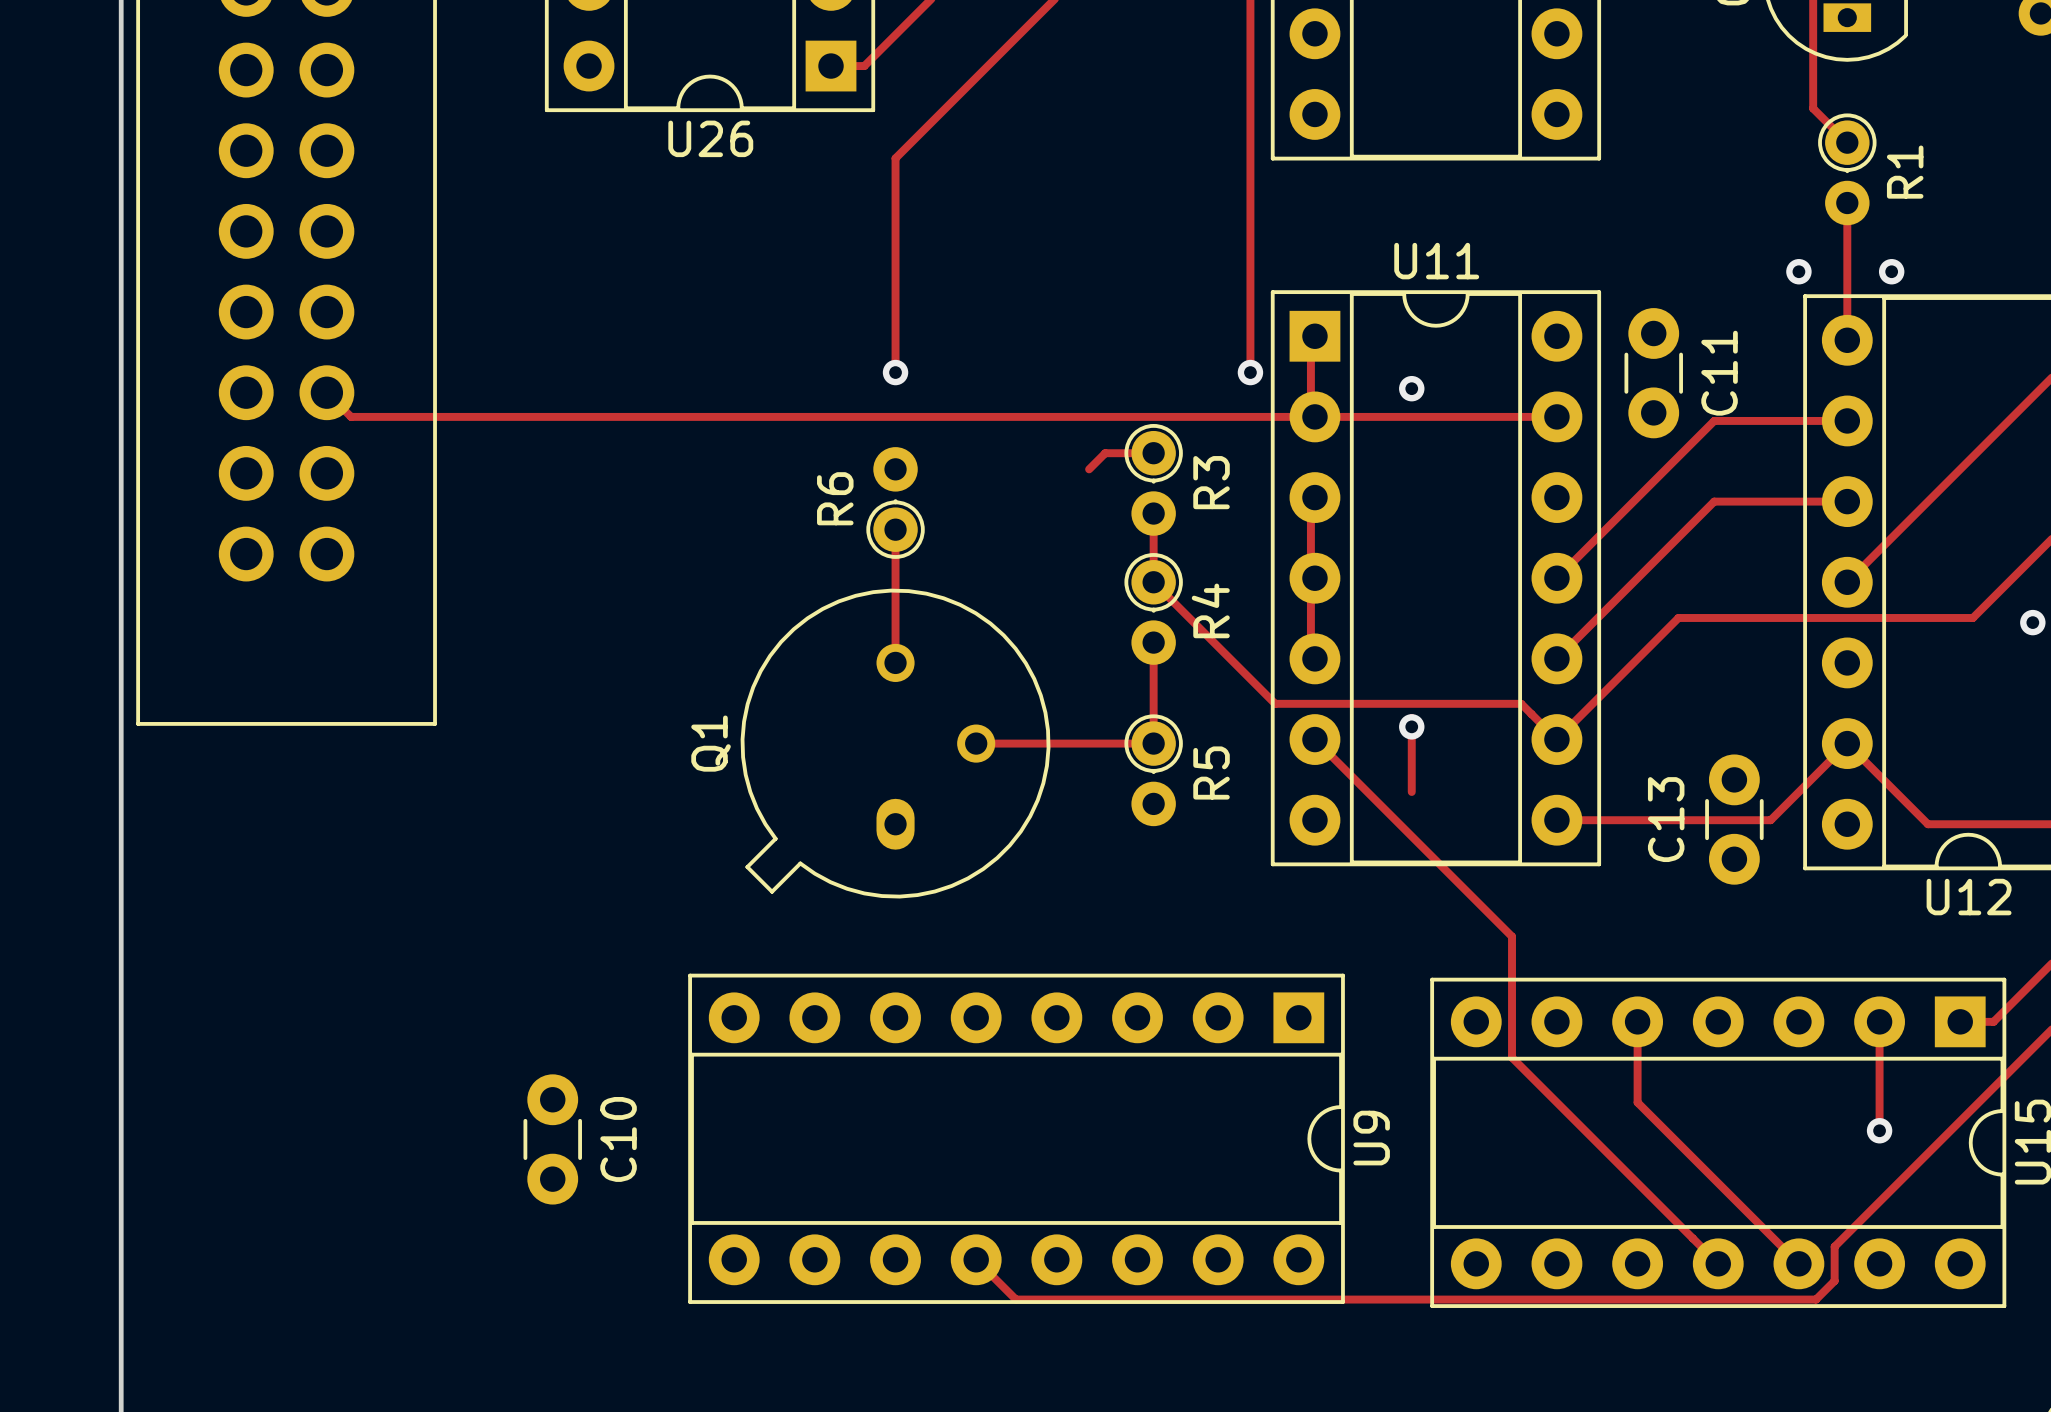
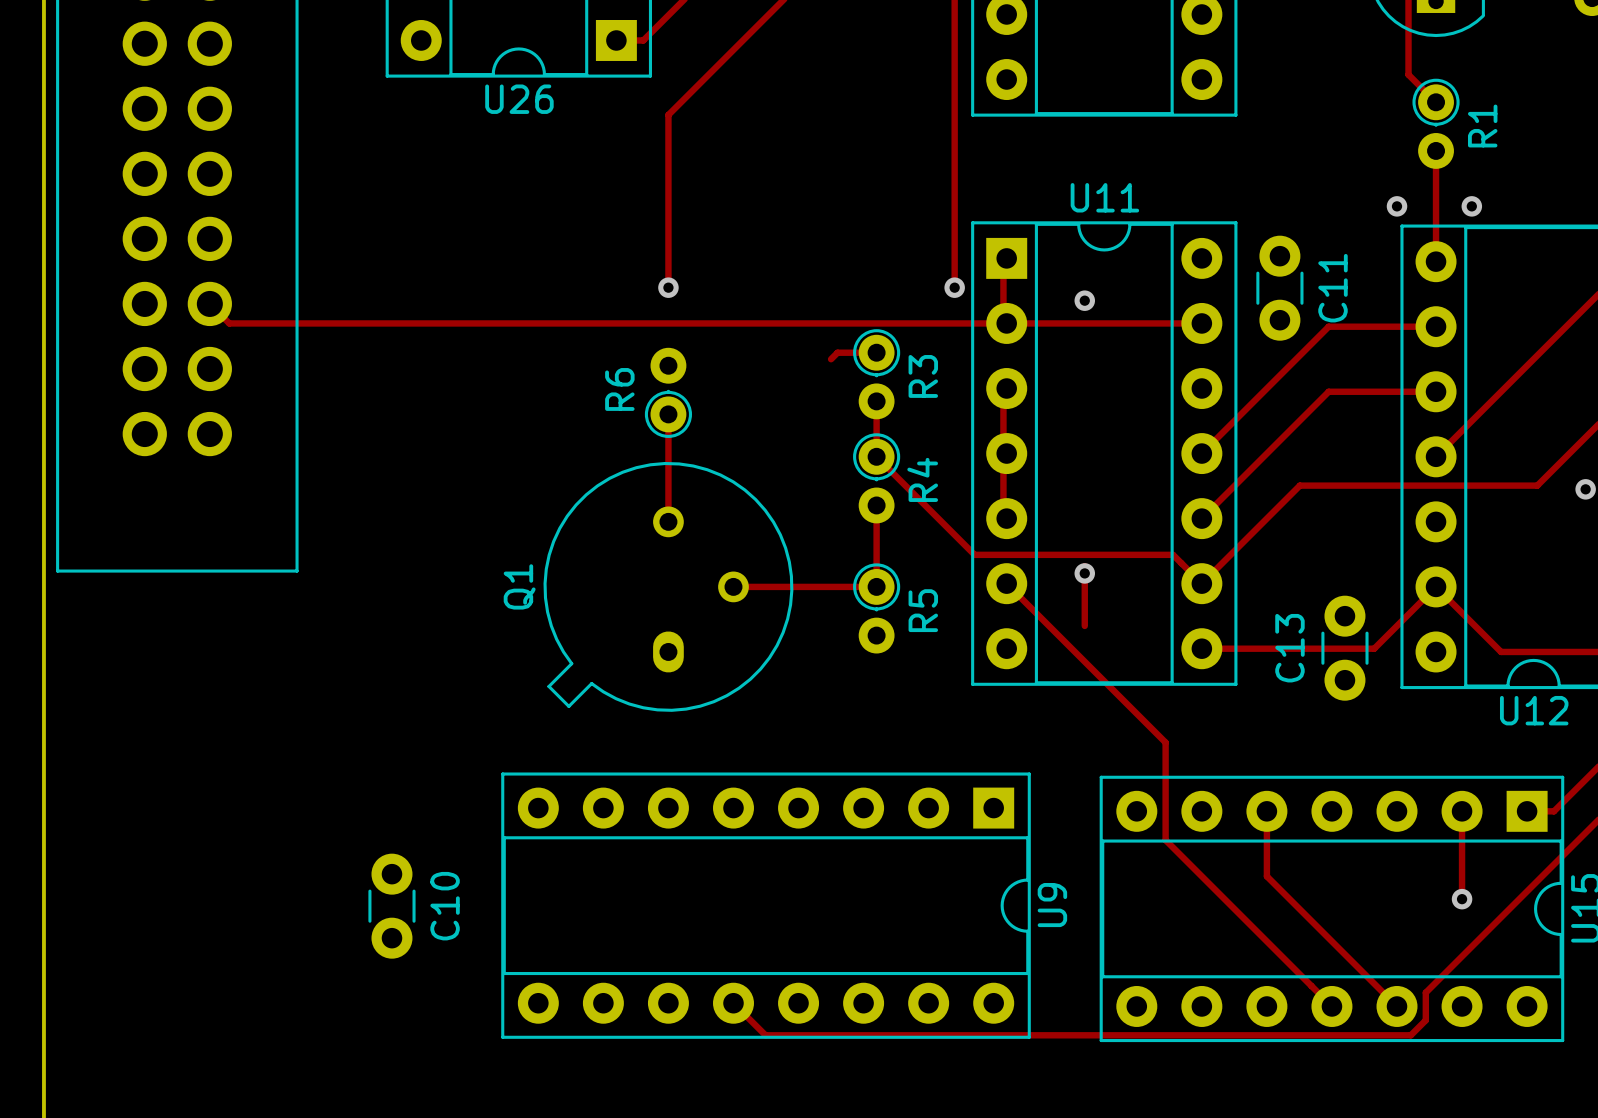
track: (1097, 461) (1089, 469) -> none

